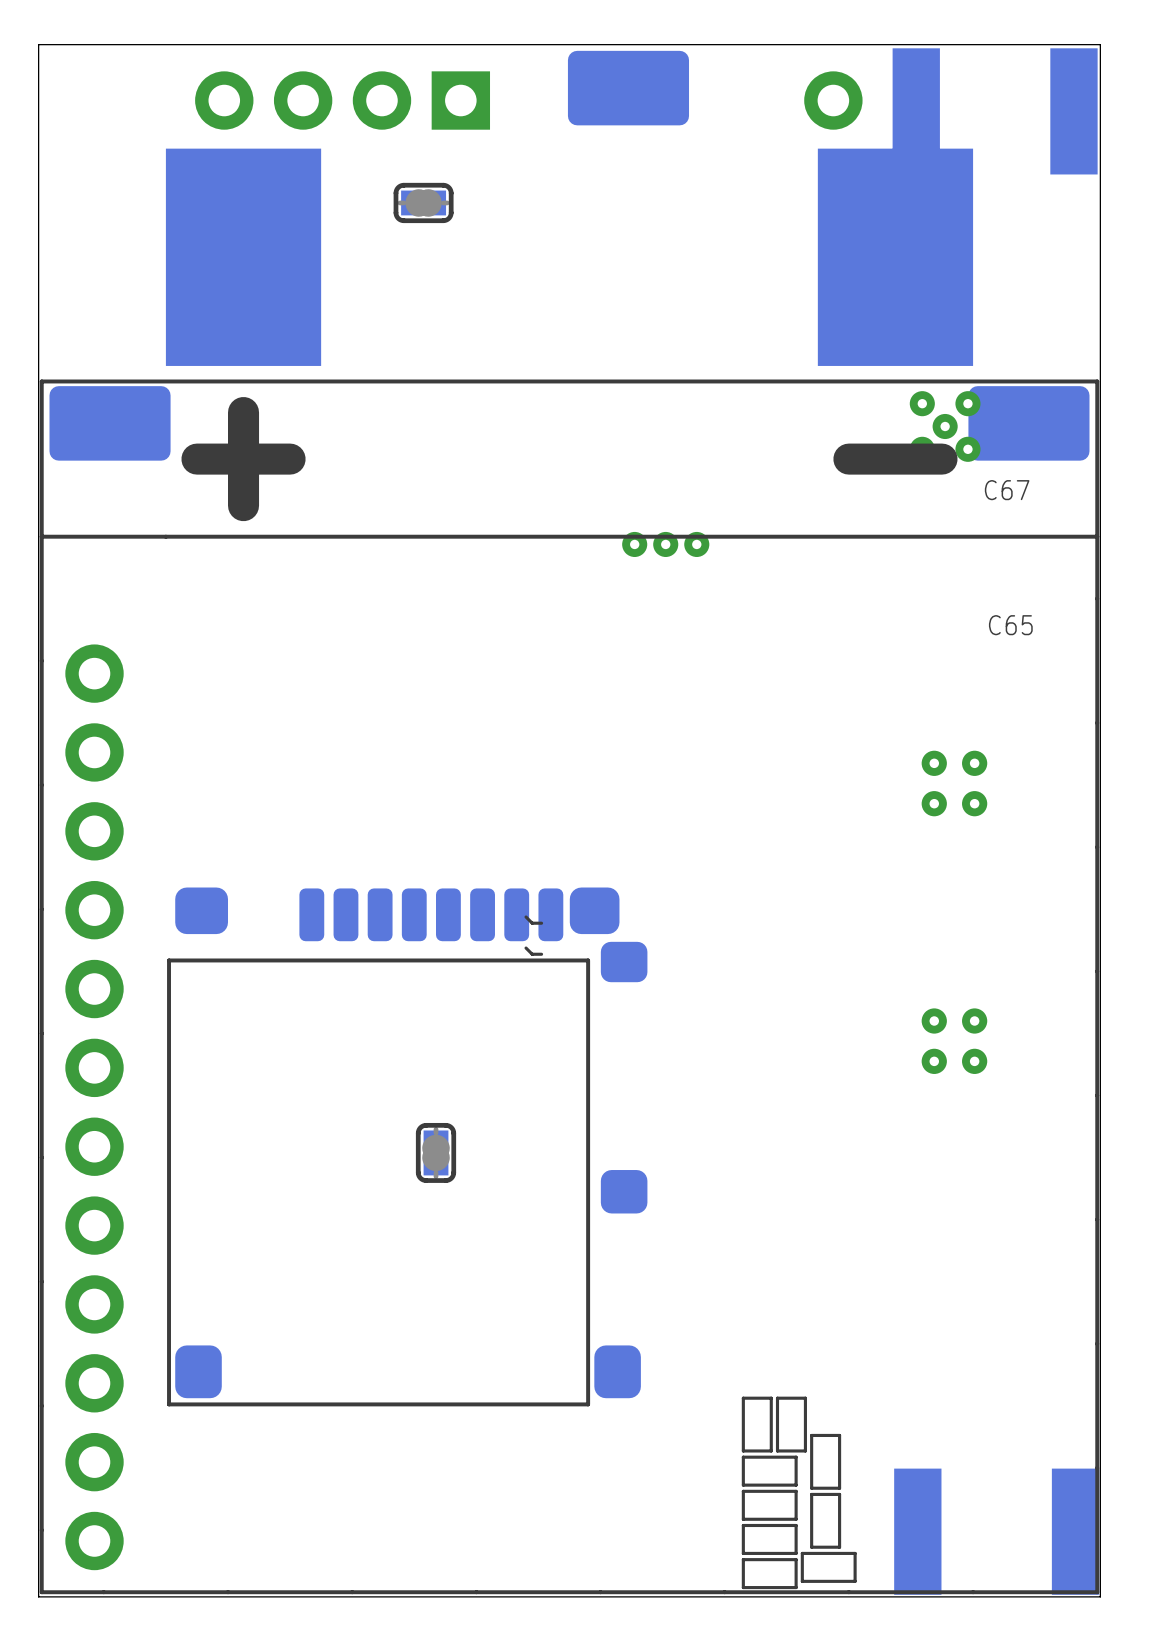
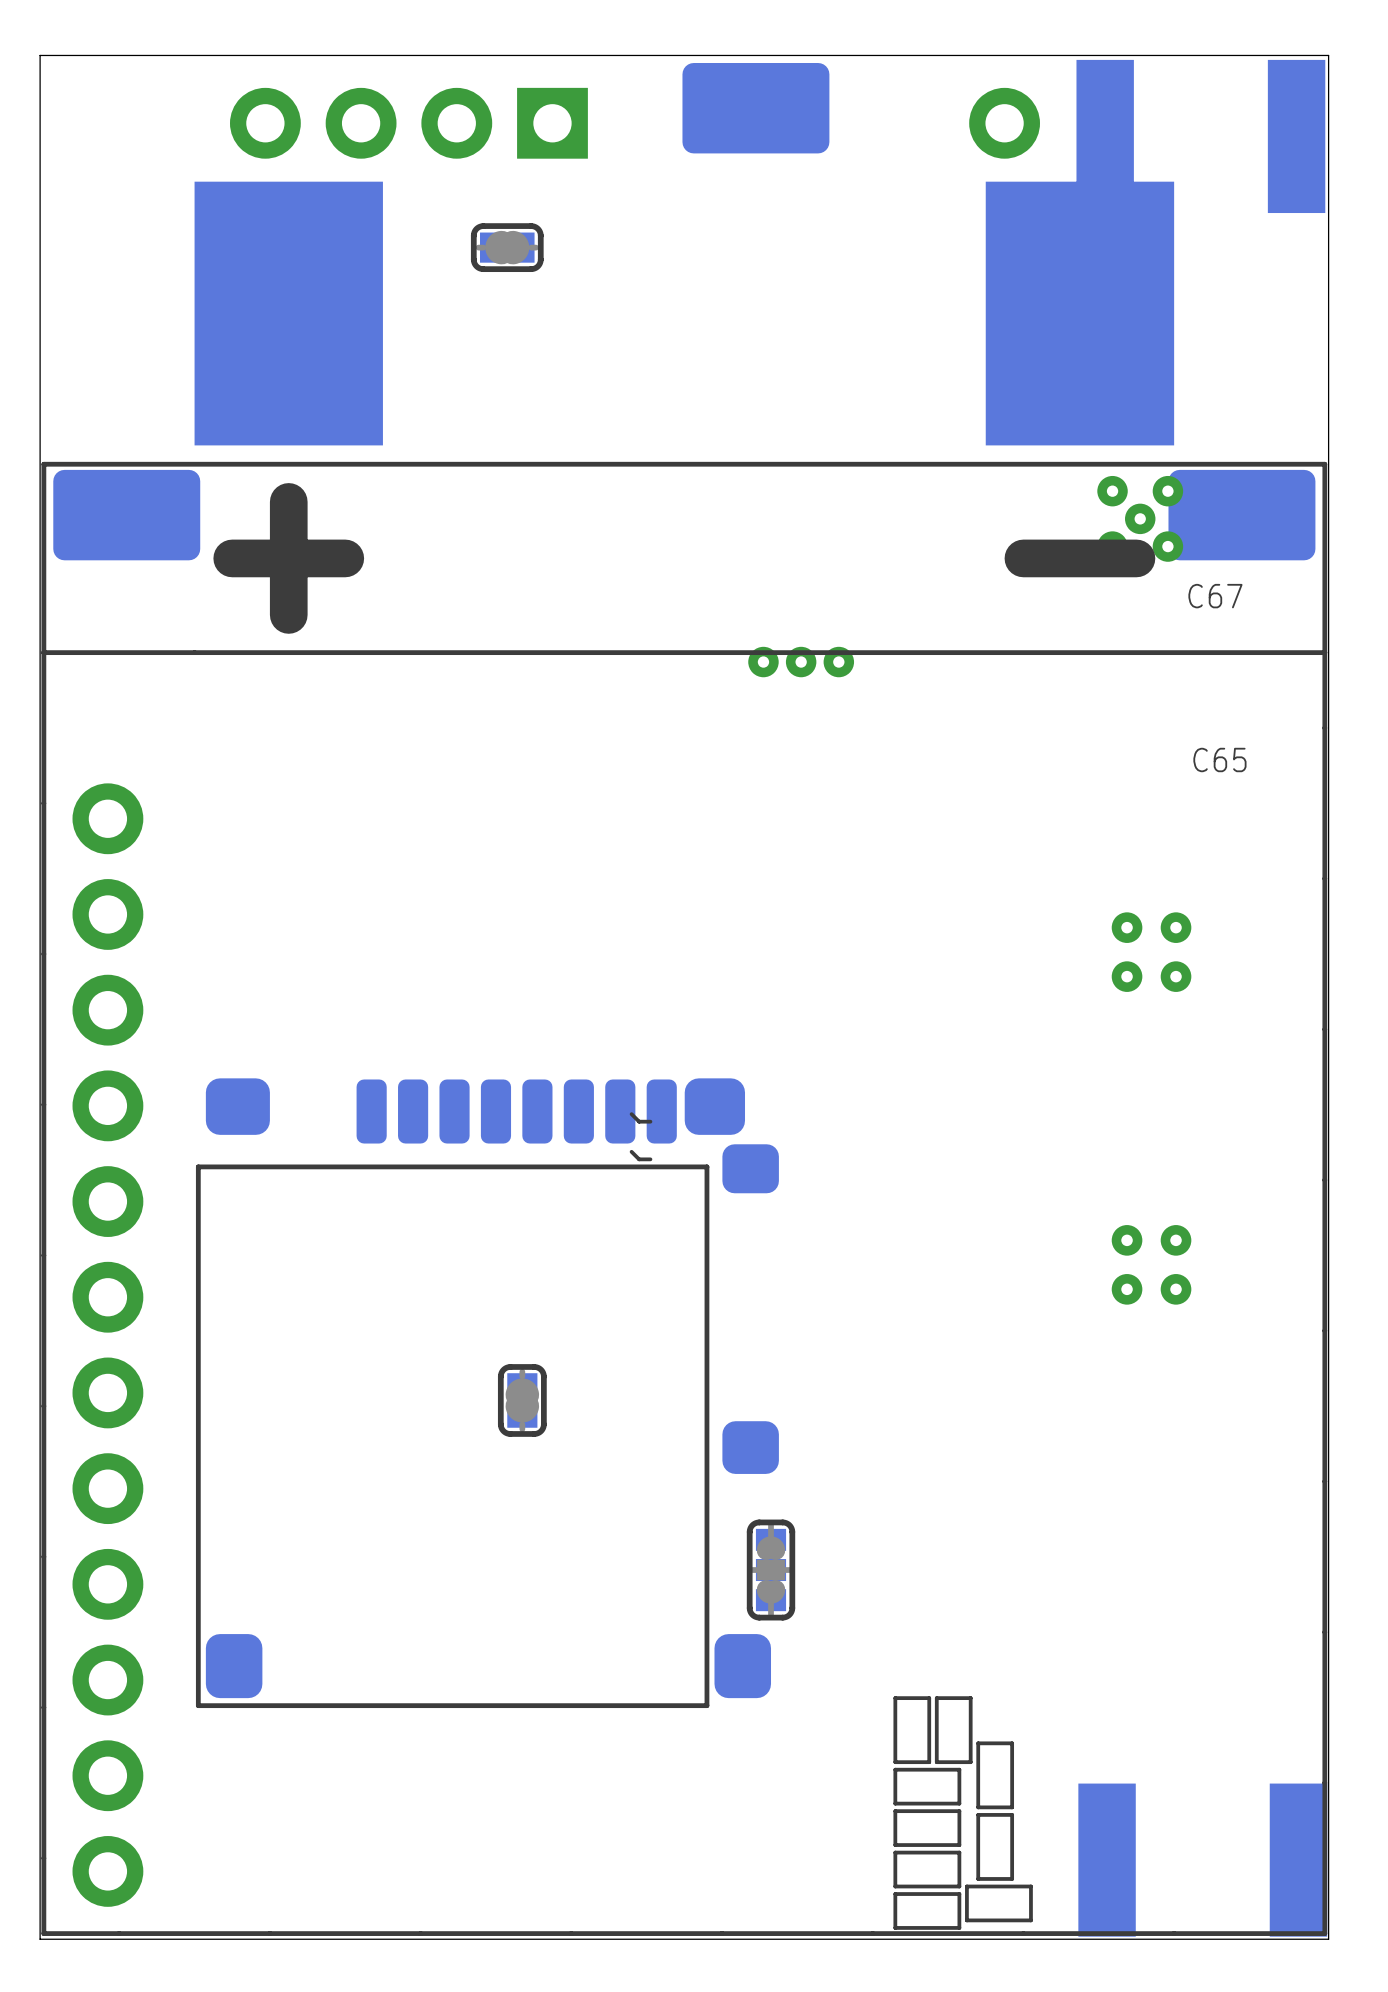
part: none -> (771, 1570)

